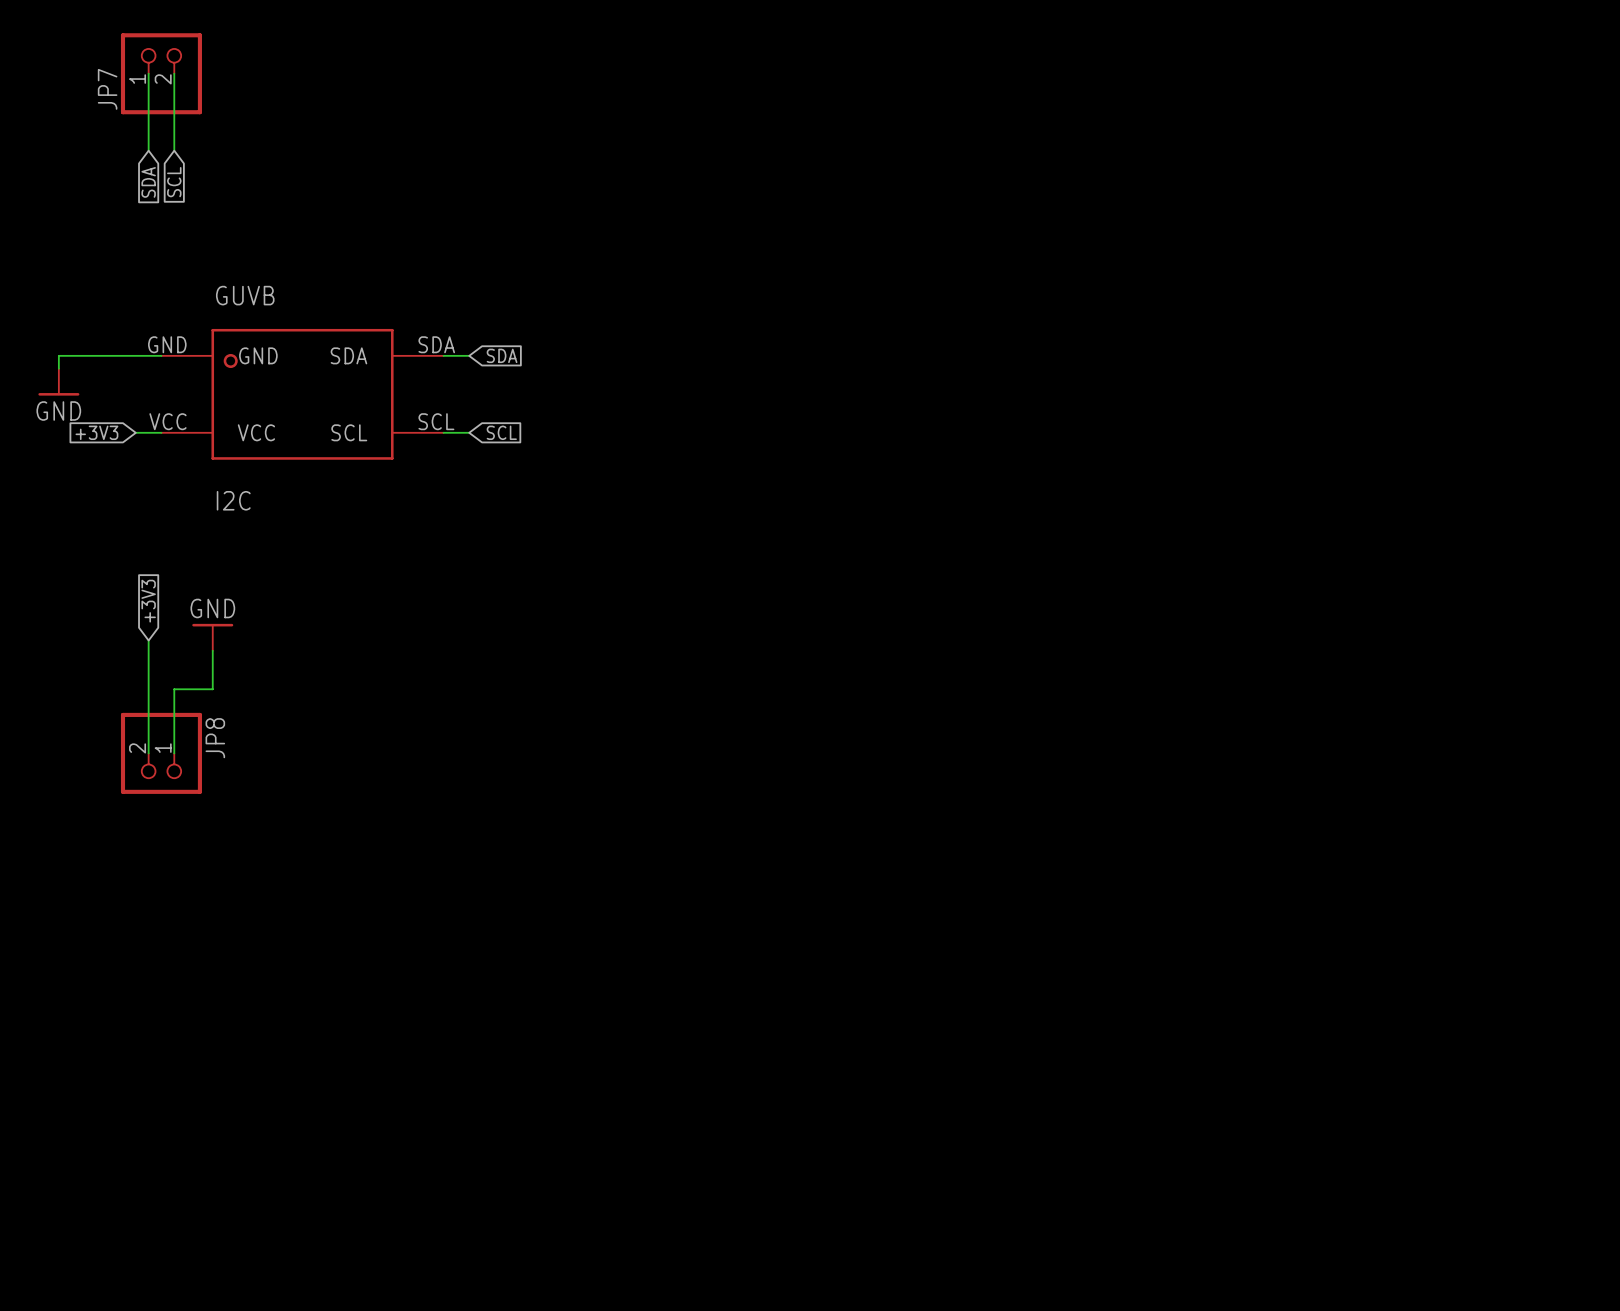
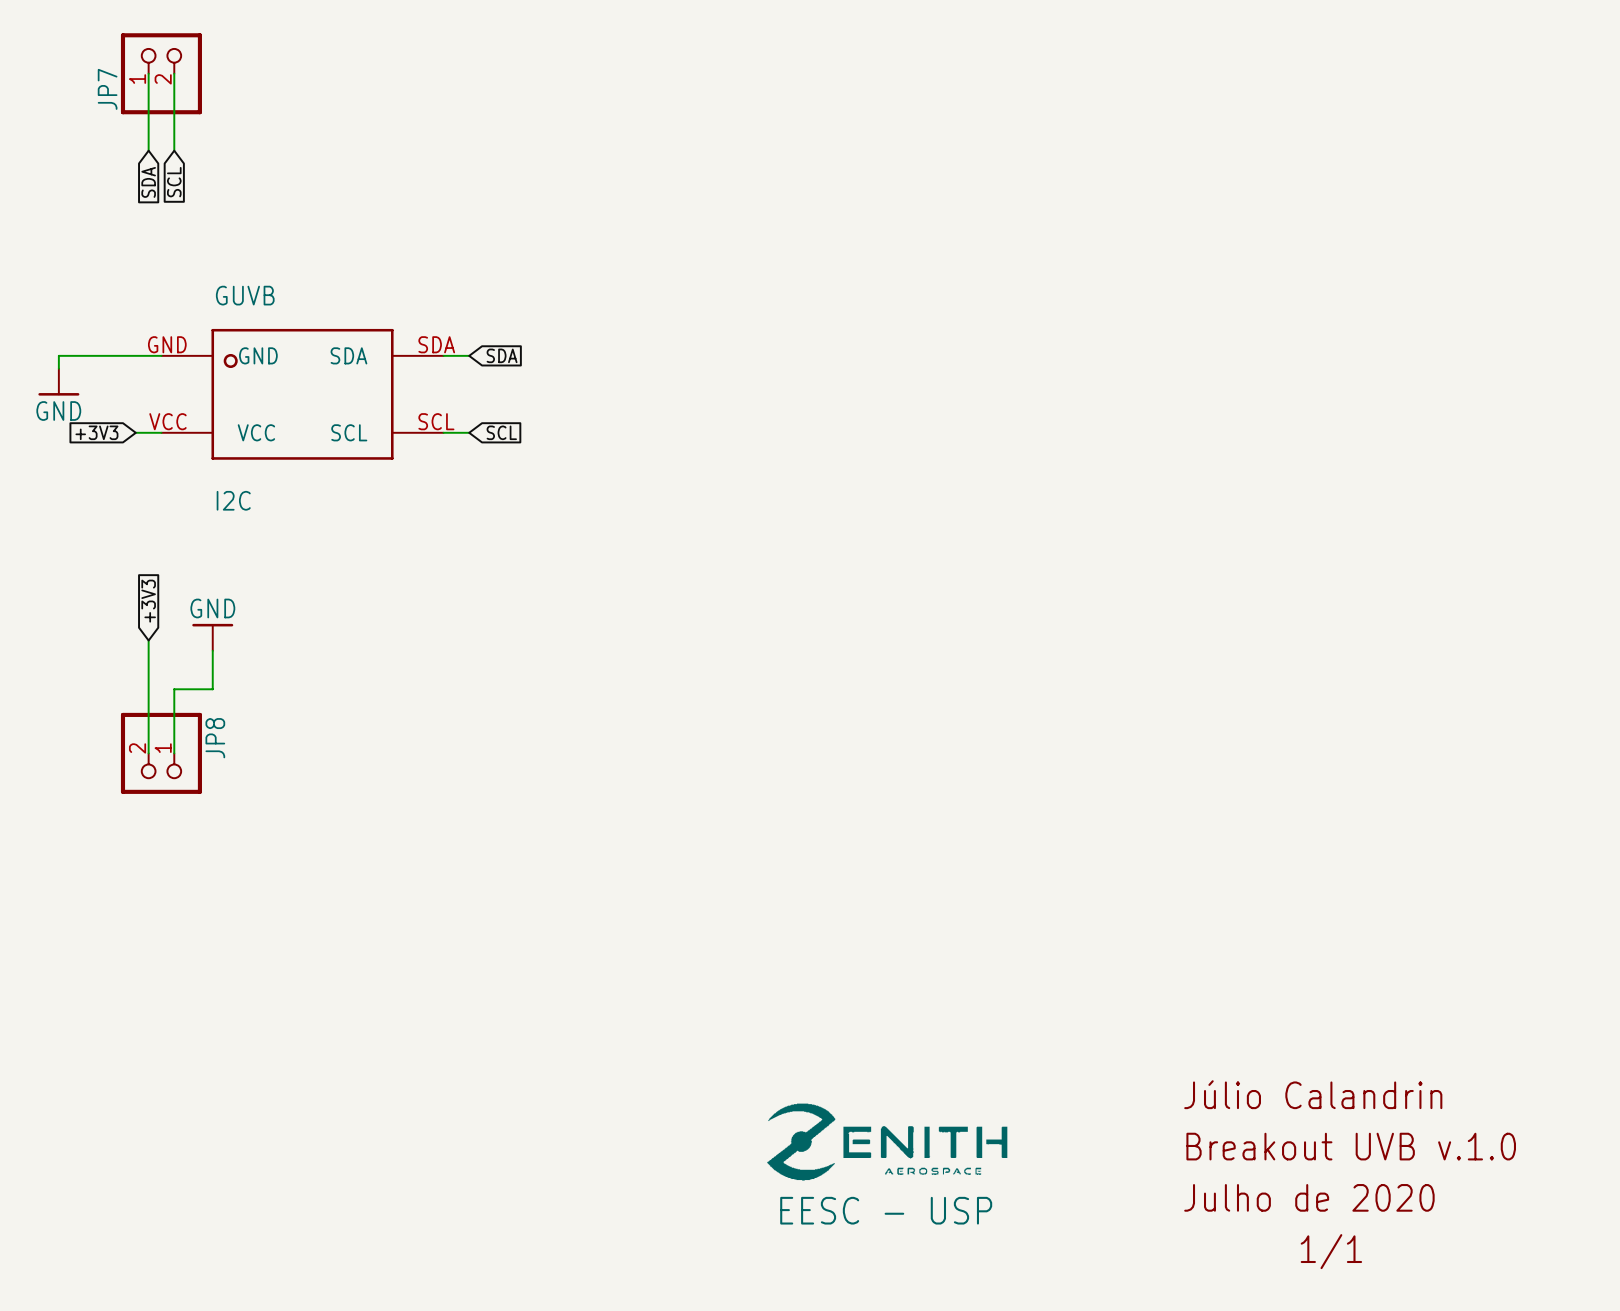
text: none -> Júlio Calandrin (1313, 1094)
drawing: none -> [767, 1103, 1008, 1181]
text: none -> Breakout UVB v.1.0 (1351, 1146)
text: none -> Julho de 2020 (1309, 1197)
text: none -> EESC - USP (886, 1210)
text: none -> 1/1 (1331, 1251)

